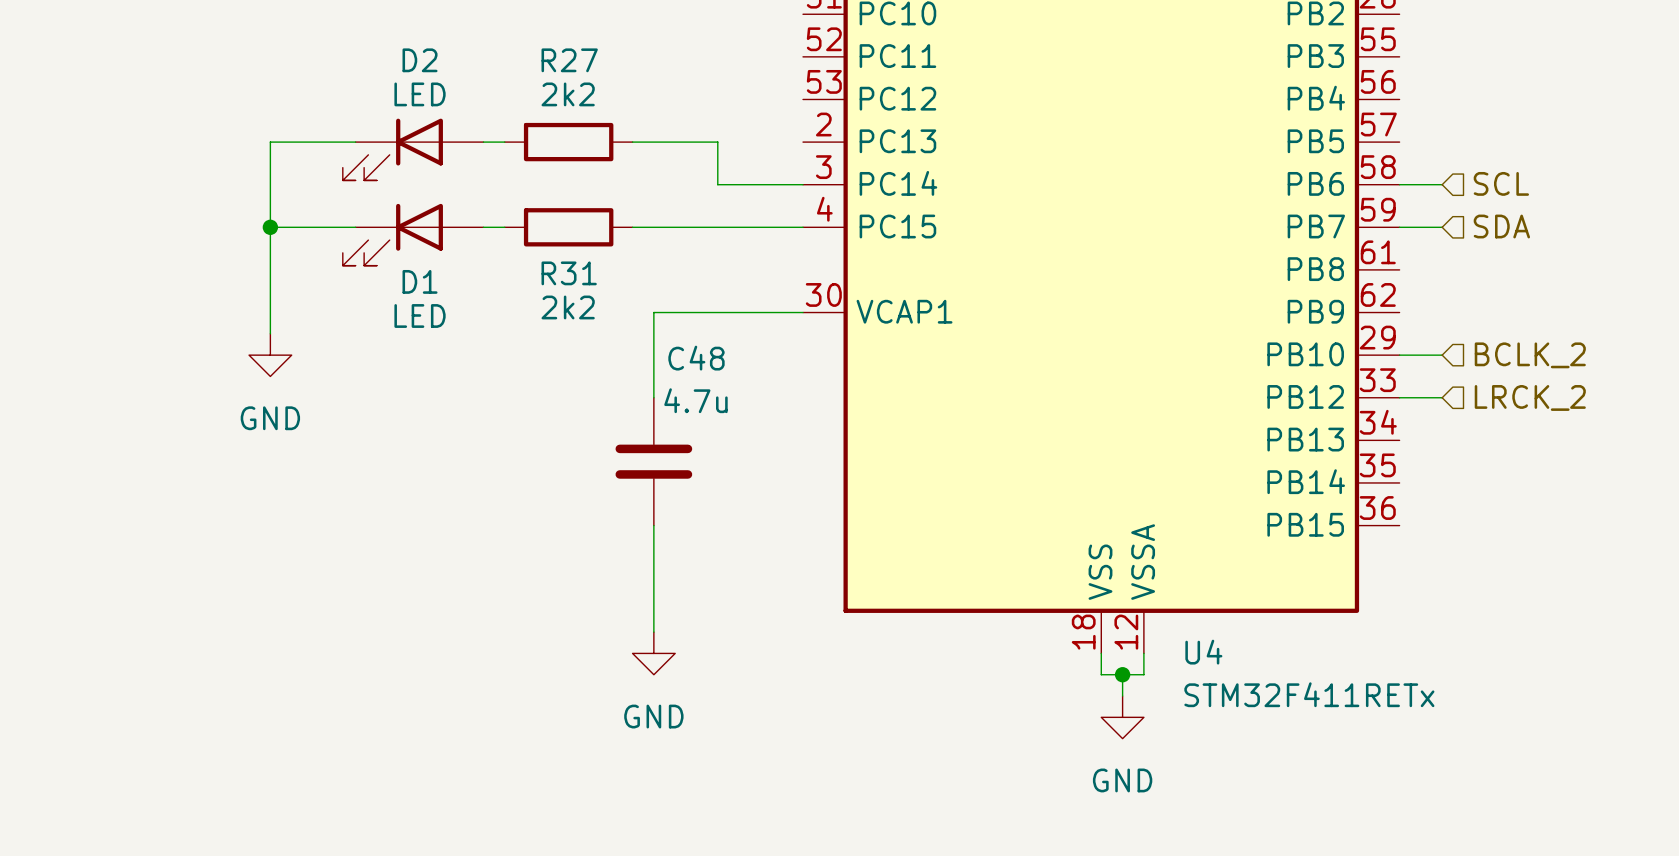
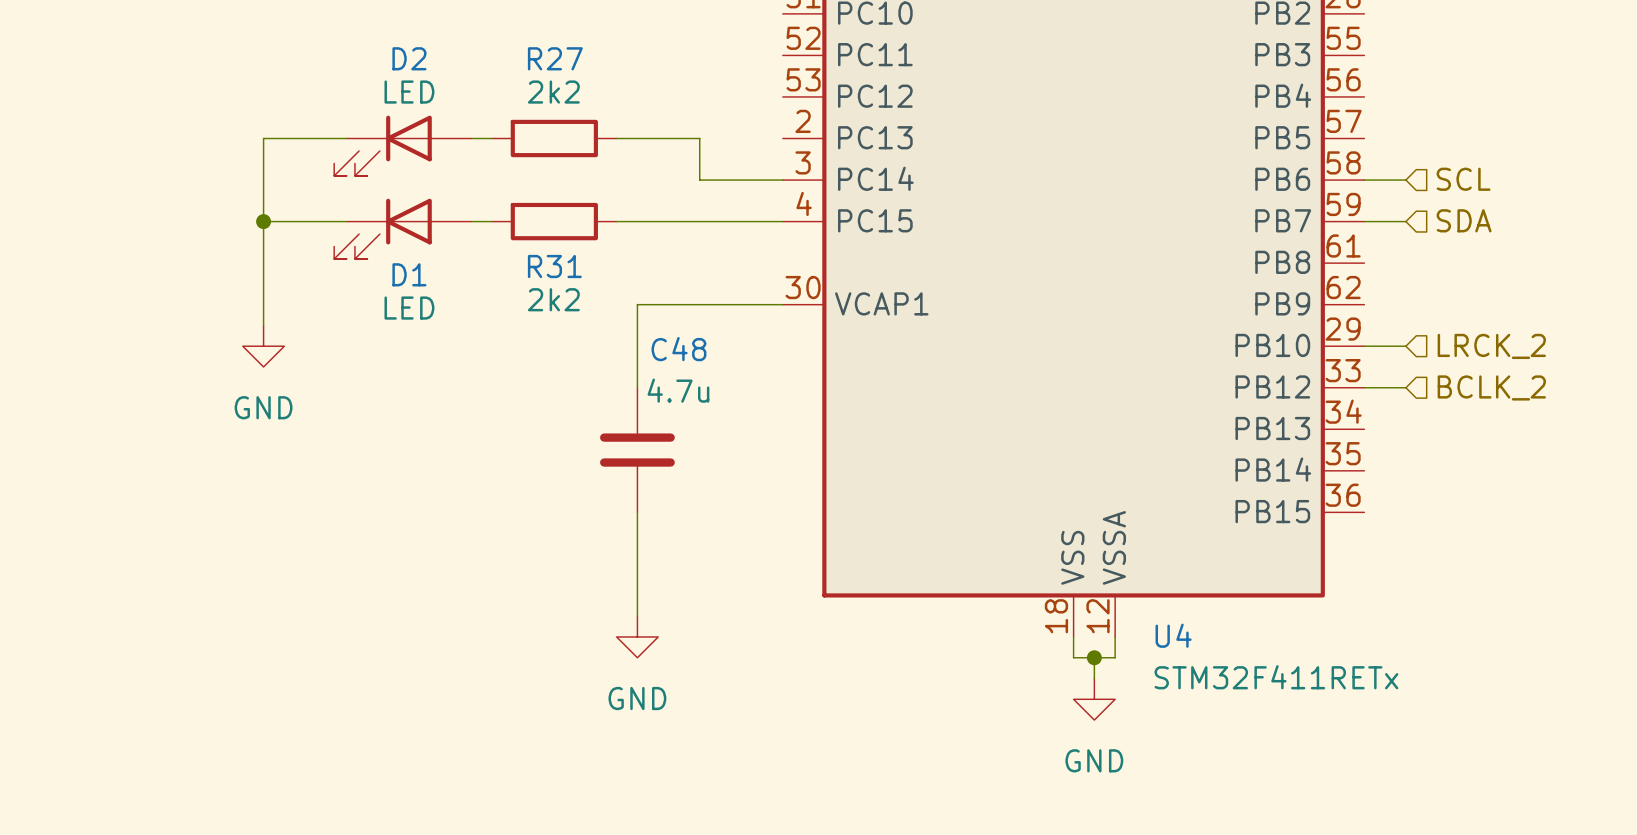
hierarchical label: BCLK_2 (1530, 355) -> LRCK_2 (1491, 346)
hierarchical label: LRCK_2 (1530, 397) -> BCLK_2 (1491, 387)

